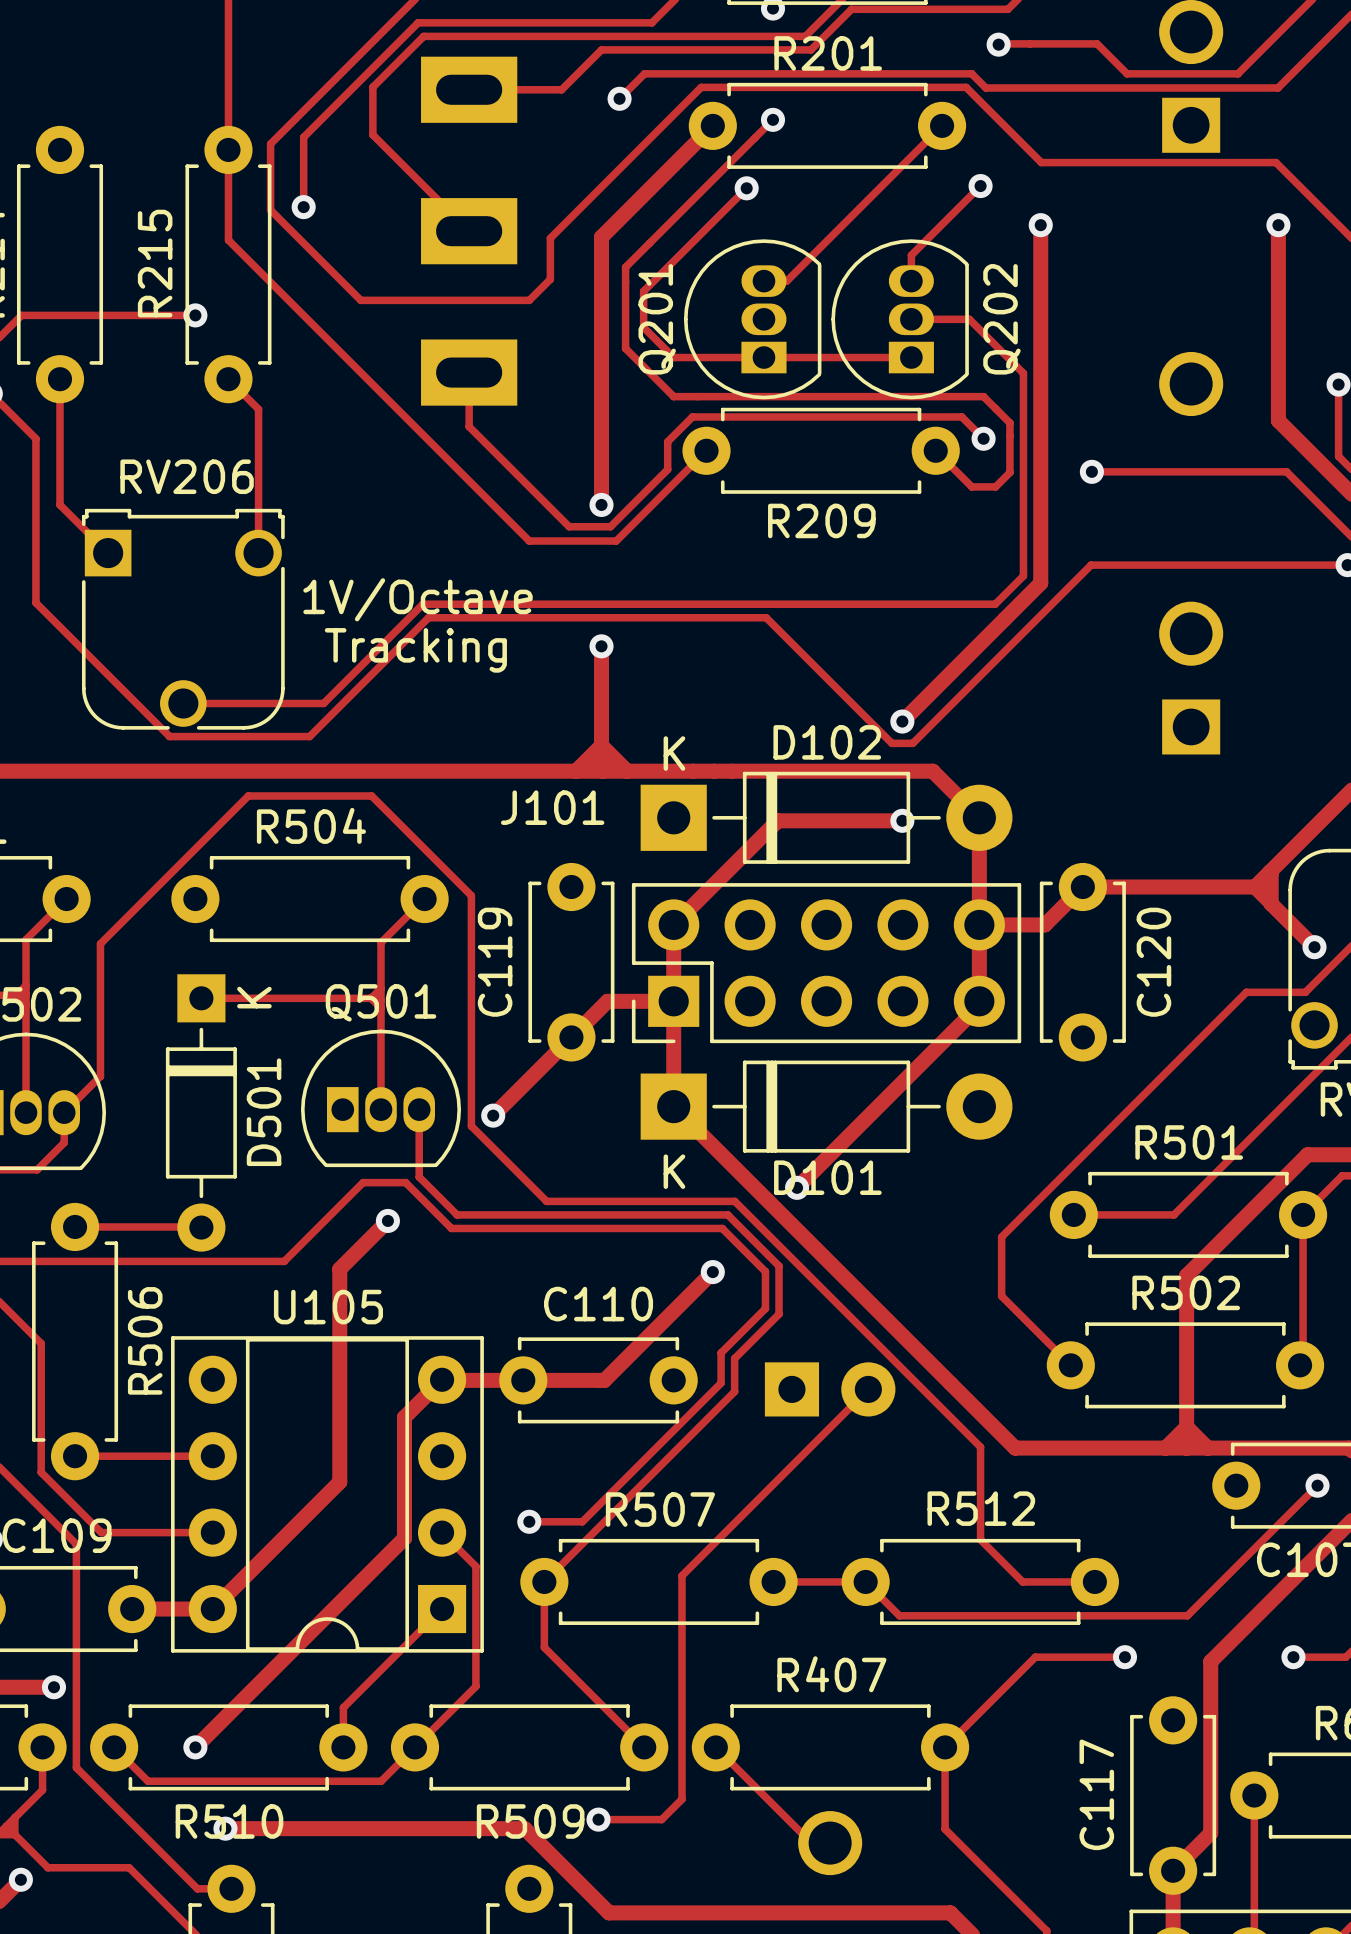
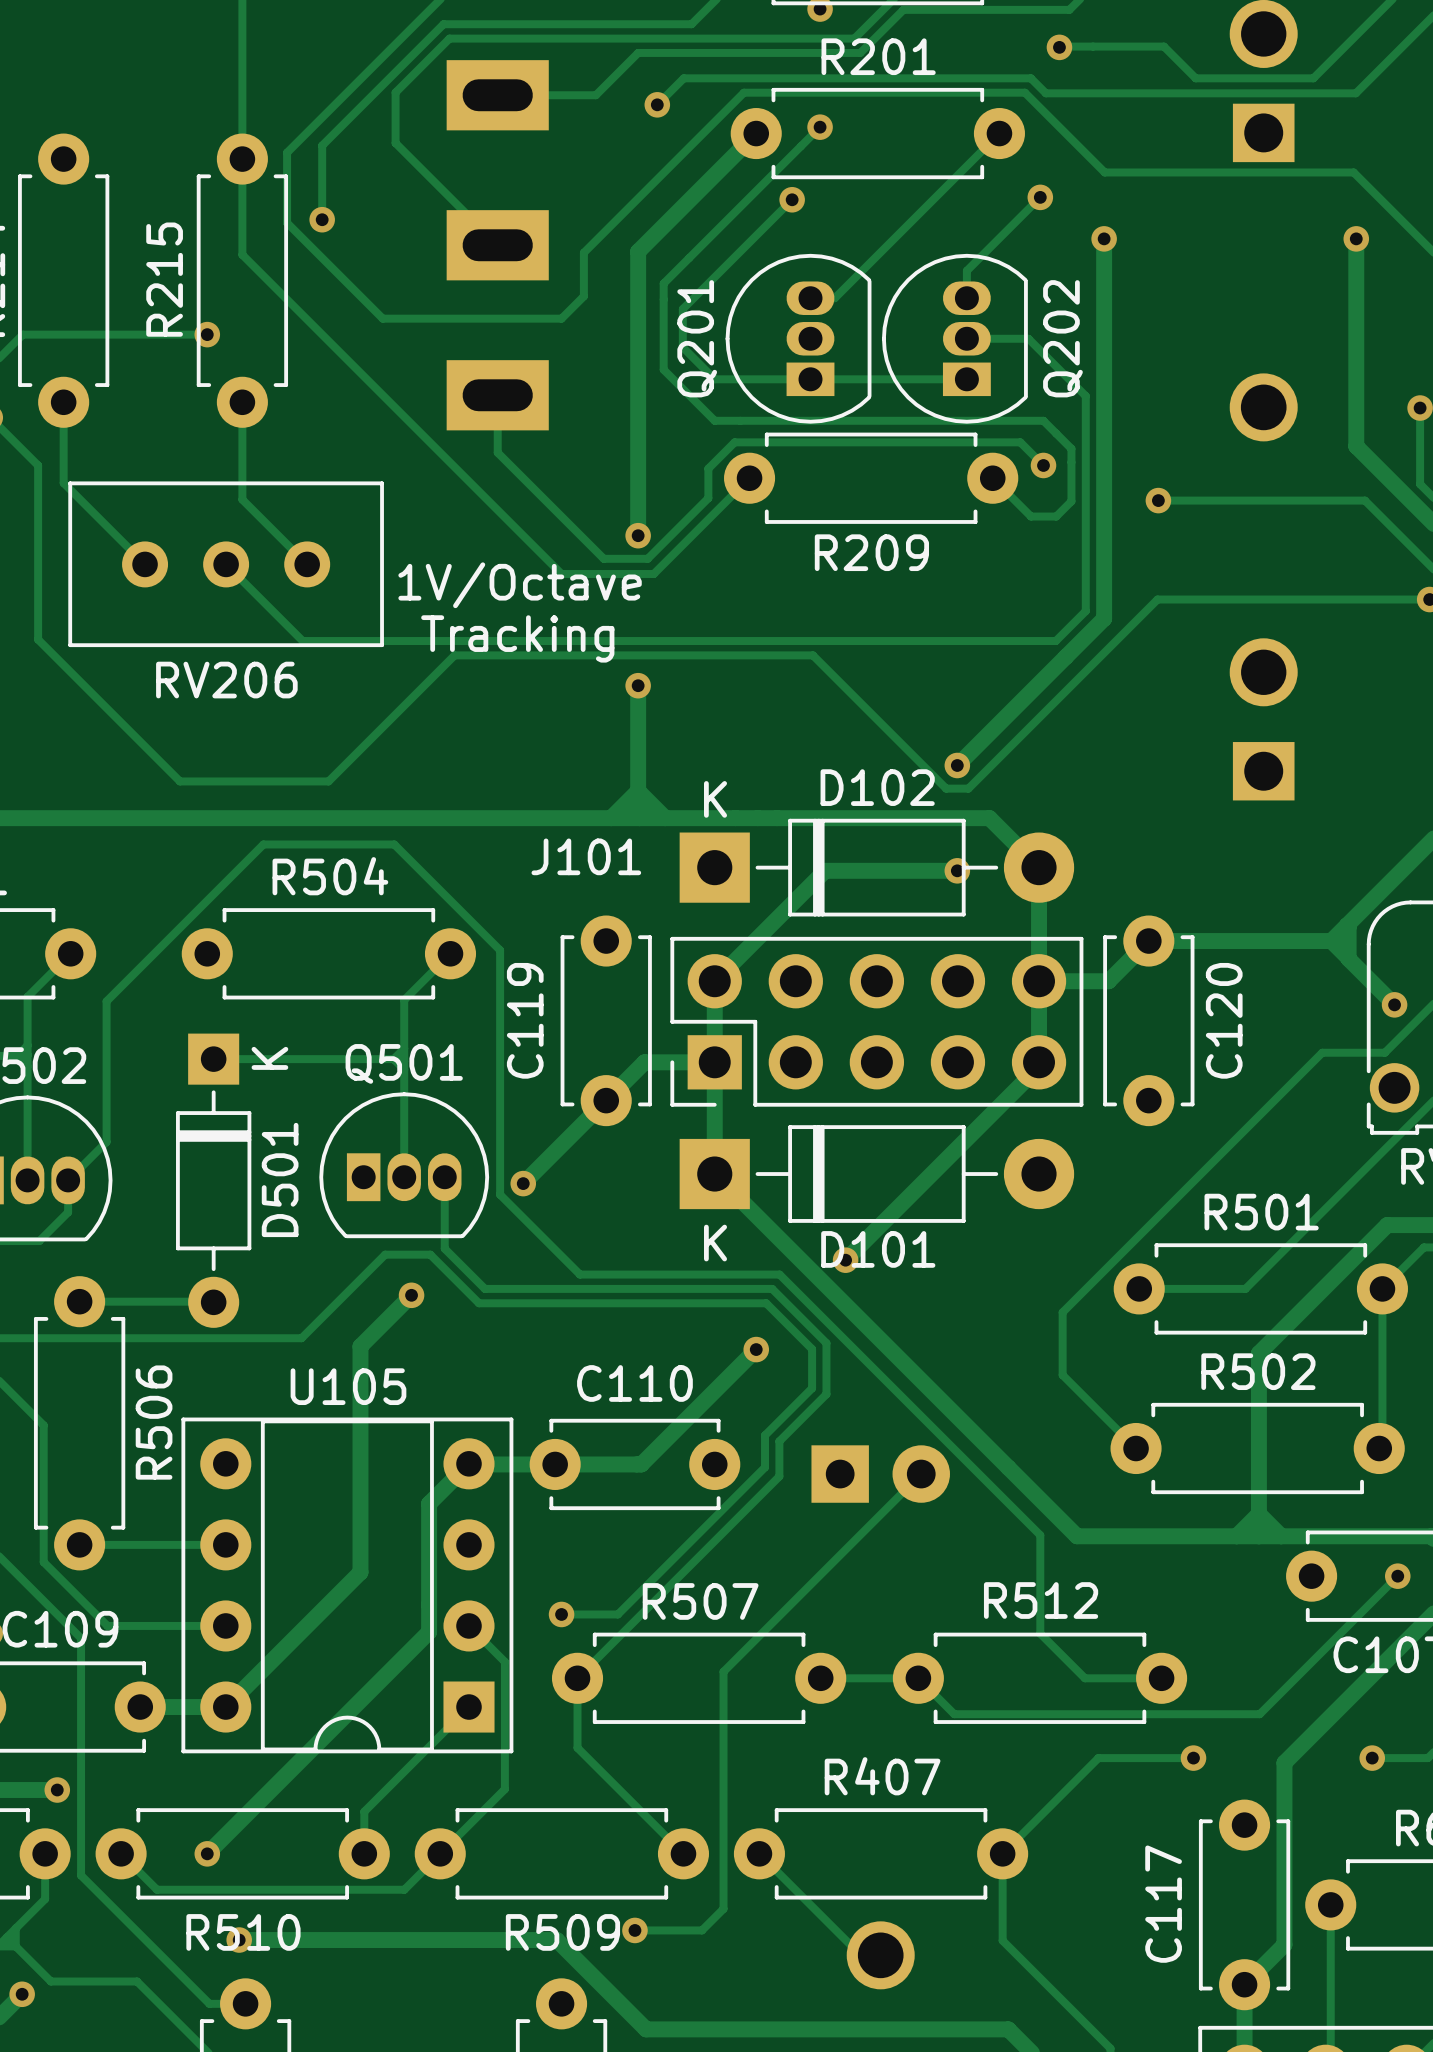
track: (228, 379) (258, 409) (258, 553) -> (242, 402) (242, 499) (307, 564)
track: (60, 455) (60, 504) (108, 553) -> (63, 483) (145, 564)
RV206 name position: RV206 (187, 476) -> RV206 (226, 680)
RV206 footprint: [81, 508, 285, 730] -> [68, 481, 384, 648]
text position: 1V/Octave (418, 599) -> 1V/Octave (520, 585)
track: (422, 604) (323, 703) (183, 703) -> (448, 641) (302, 641) (226, 564)
text position: Tracking (415, 650) -> Tracking (517, 638)

